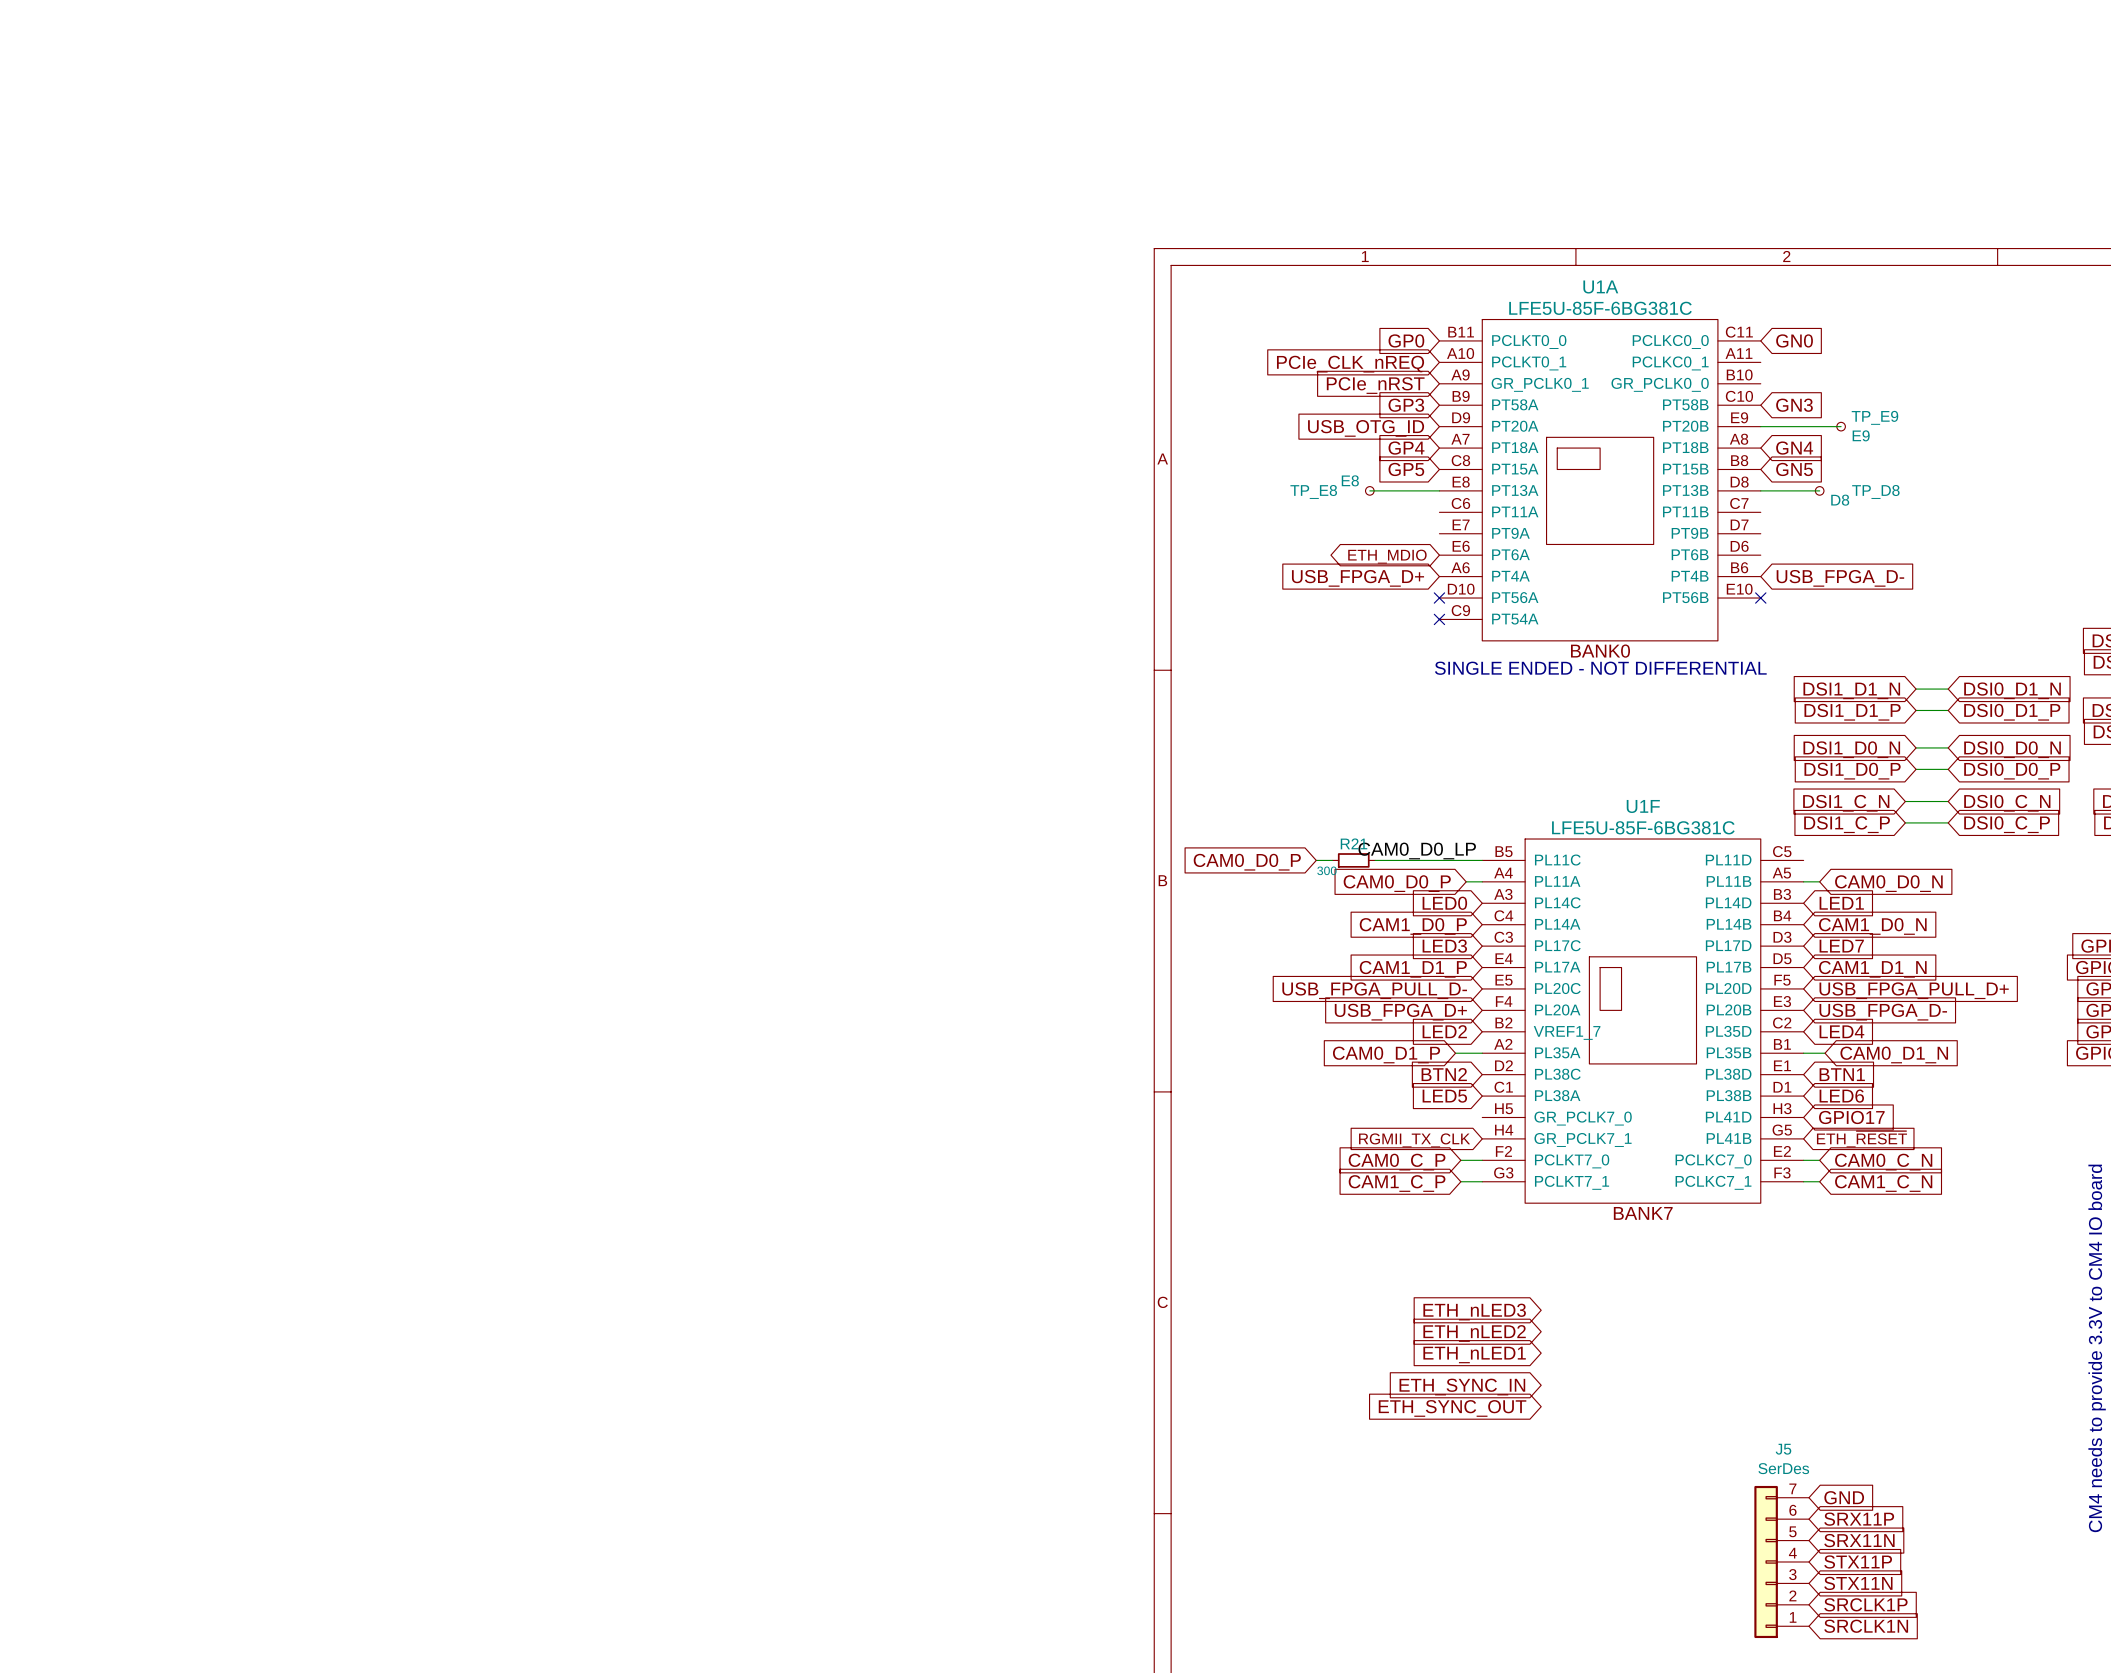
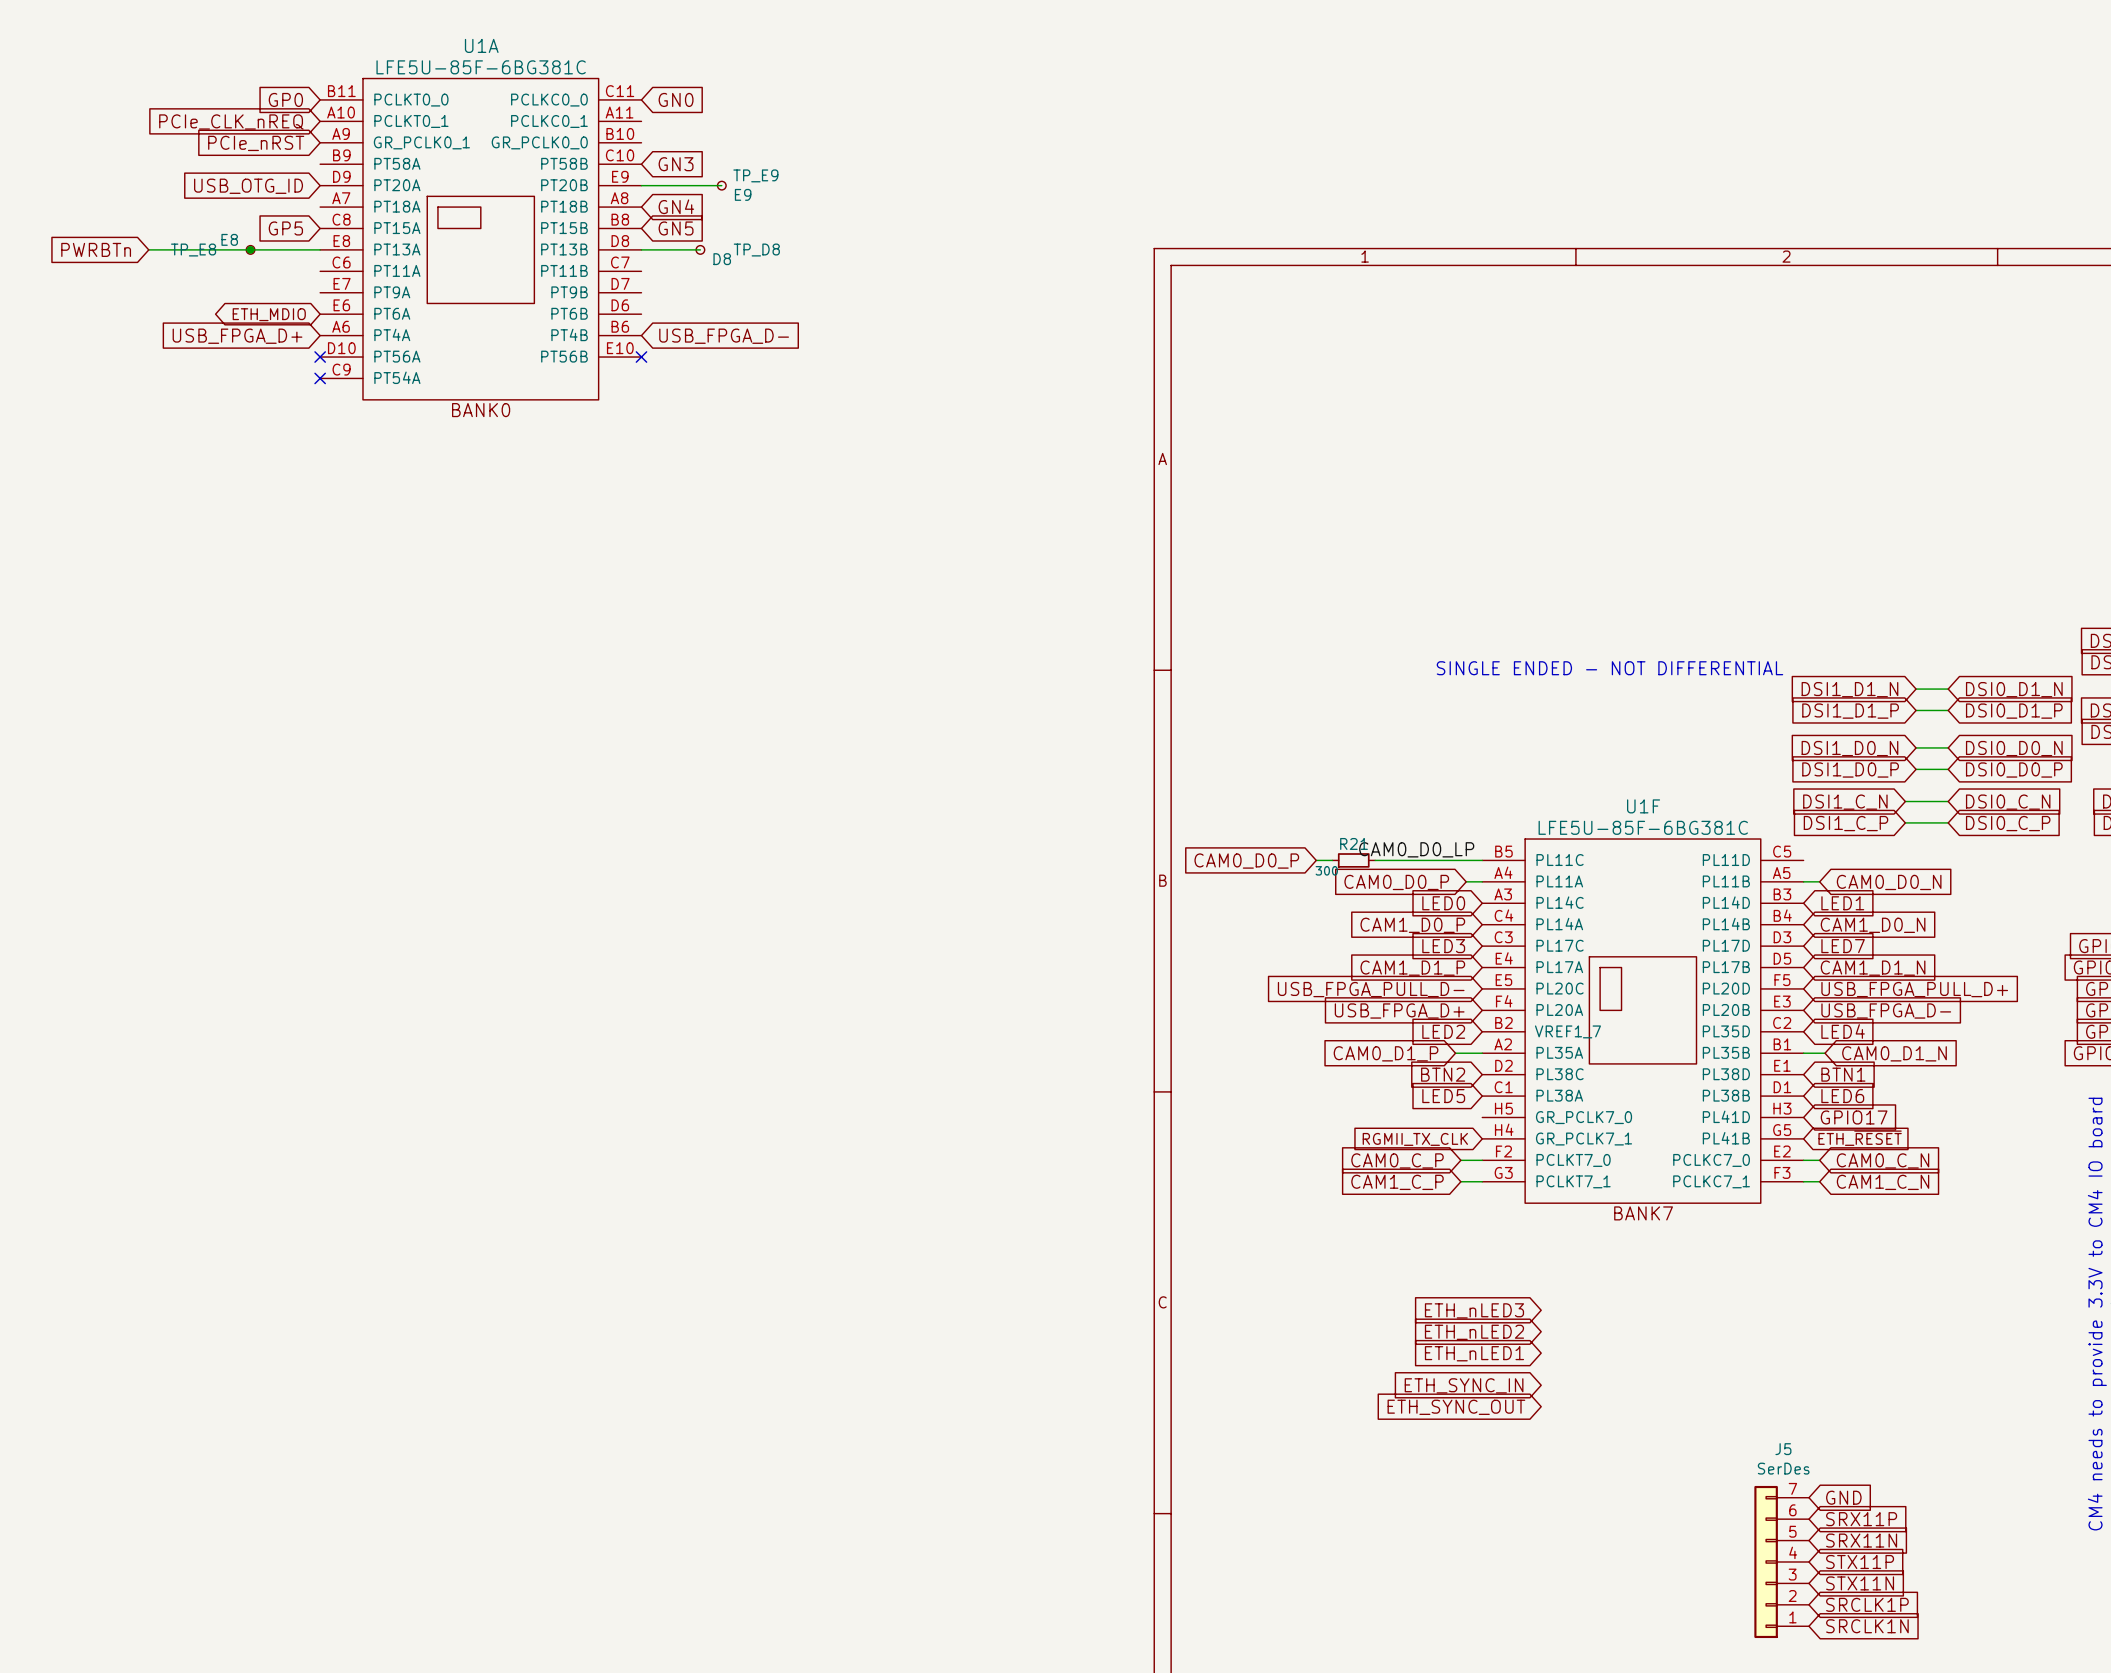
global label: none -> GP0 (285, 99)
global label: none -> GN0 (676, 99)
global label: none -> PCIe_CLK_nREQ (231, 121)
global label: none -> PCIe_nRST (256, 143)
global label: none -> GN3 (676, 164)
wire: none -> (641, 185) (721, 185)
global label: none -> USB_OTG_ID (248, 186)
global label: none -> GN4 (676, 206)
global label: none -> GP5 (285, 228)
global label: none -> GN5 (676, 228)
global label: none -> PWRBTn (96, 249)
wire: none -> (148, 249) (320, 249)
junction: none -> (250, 249)
wire: none -> (641, 249) (700, 249)
global label: none -> ETH_MDIO (269, 314)
global label: none -> USB_FPGA_D+ (237, 336)
global label: none -> USB_FPGA_D- (724, 336)
global label: GP0 (1406, 340) -> none
global label: GN0 (1794, 340) -> none
no-connect mark: none -> (320, 357)
no-connect mark: none -> (641, 357)
global label: PCIe_CLK_nREQ (1350, 364) -> none
no-connect mark: none -> (320, 378)
global label: PCIe_nRST (1375, 385) -> none
global label: GP3 (1406, 405) -> none
global label: GN3 (1794, 405) -> none
wire: (1760, 426) (1841, 426) -> none
TP_E9 position: (1841, 426) -> (721, 185)
global label: USB_OTG_ID (1366, 428) -> none
global label: GP4 (1406, 448) -> none
global label: GN4 (1794, 448) -> none
global label: GP5 (1406, 469) -> none
global label: GN5 (1794, 469) -> none
U1A position: (1600, 480) -> (480, 239)
wire: (1369, 490) (1439, 490) -> none
TP_E8 position: (1369, 490) -> (250, 249)
wire: (1760, 490) (1819, 490) -> none
TP_D8 position: (1819, 490) -> (700, 249)
global label: ETH_MDIO (1387, 556) -> none
global label: USB_FPGA_D+ (1358, 578) -> none
global label: USB_FPGA_D- (1840, 578) -> none
no-connect mark: (1439, 598) -> none
no-connect mark: (1760, 598) -> none
no-connect mark: (1439, 619) -> none

